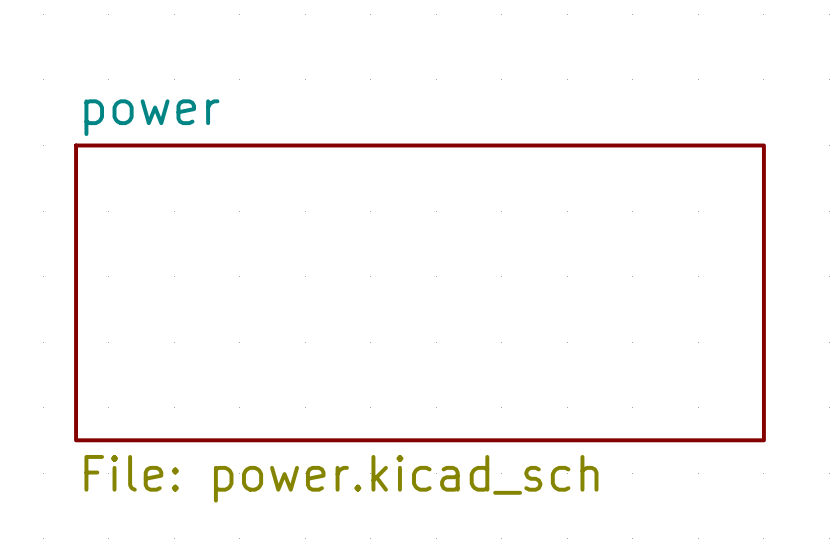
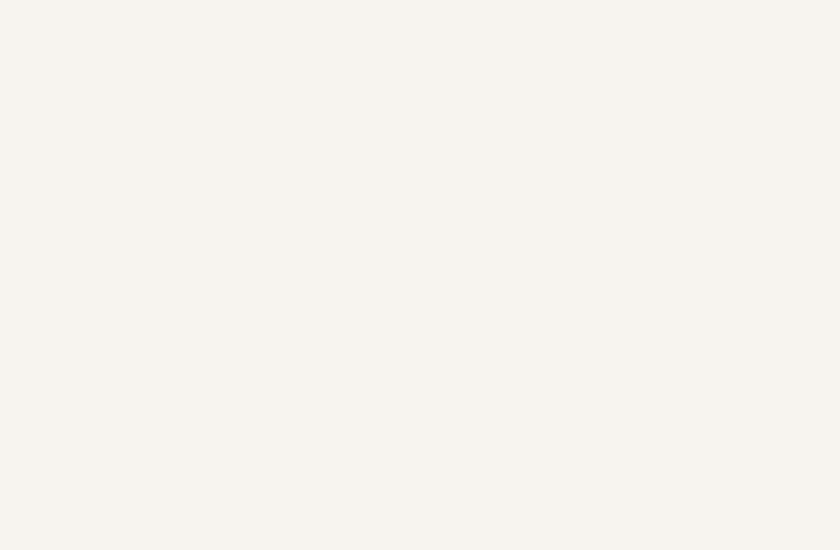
sheet power: File: power.kicad_sch (419, 292) -> none

